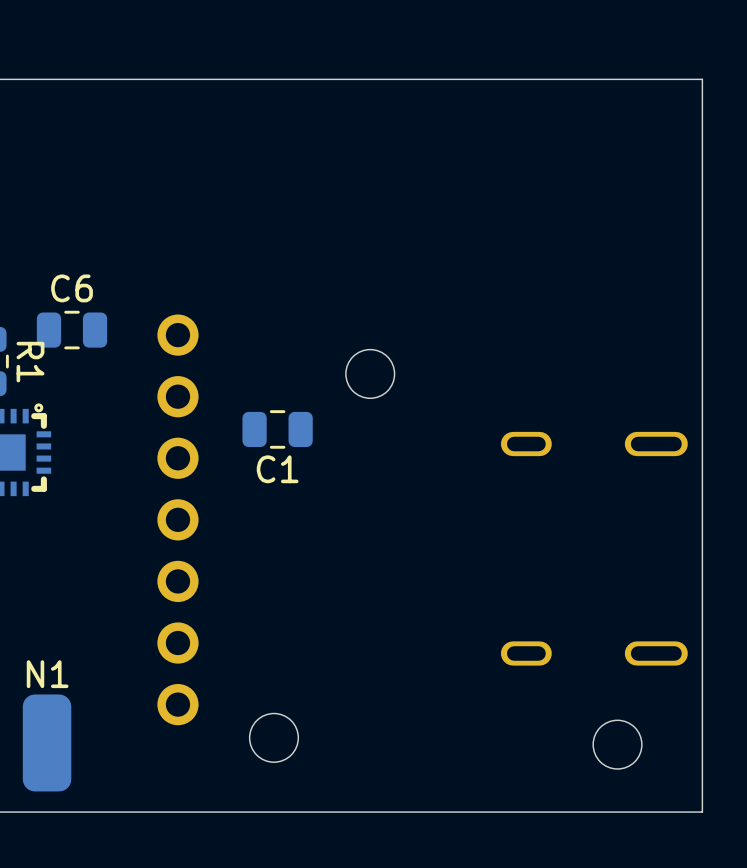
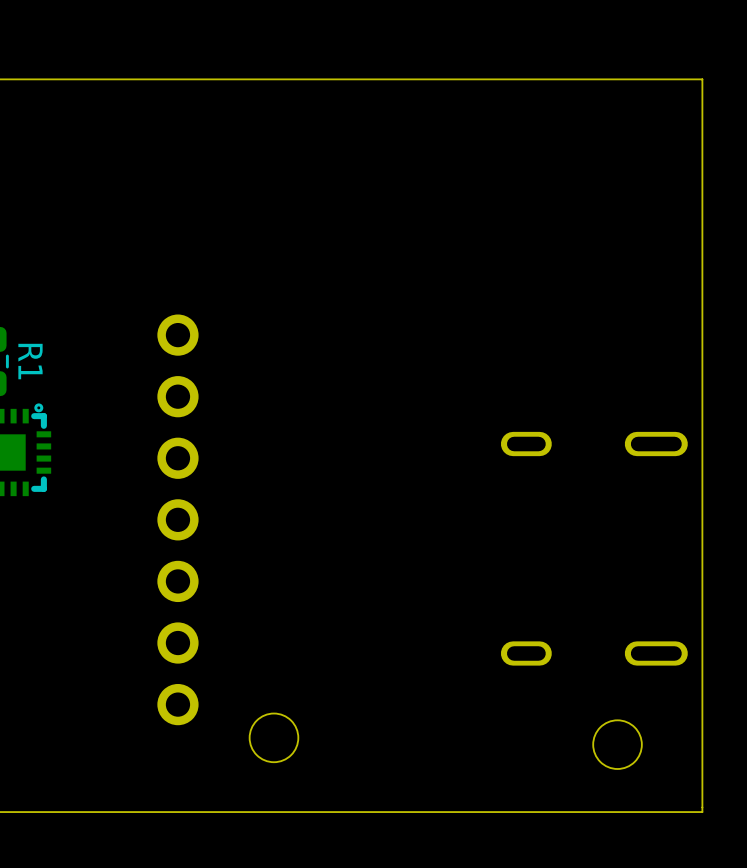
C6: (72, 330) -> none
round board edge: [345, 348, 396, 399] -> none
C1: (277, 429) -> none
N1: (47, 742) -> none

